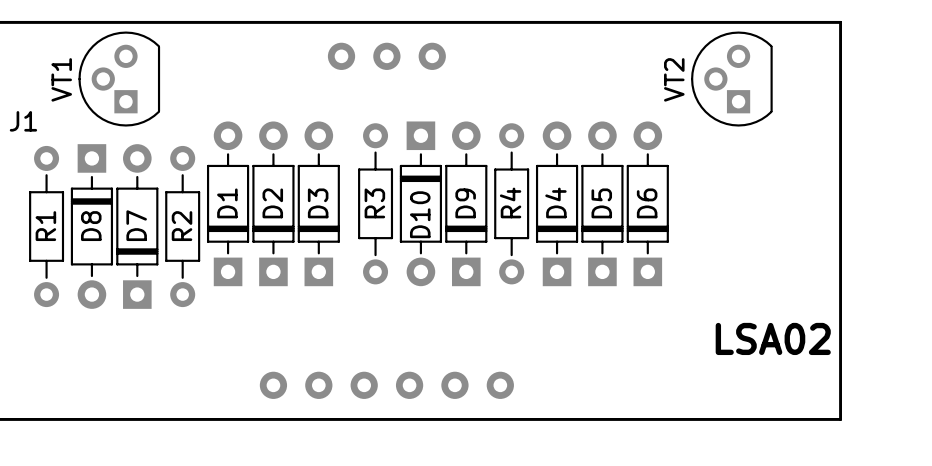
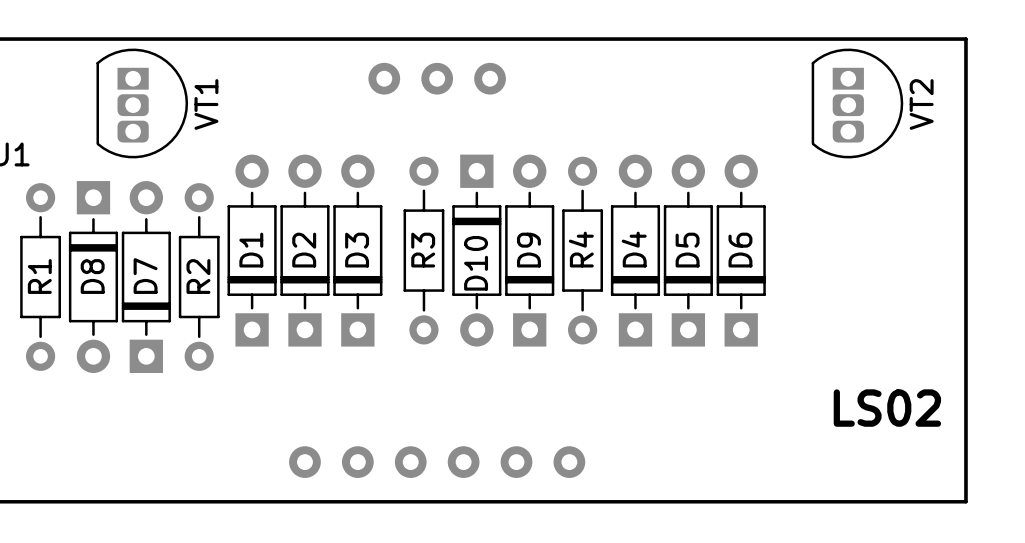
VT1 footprint: [78, 31, 161, 127] -> [96, 48, 189, 159]
VT2 footprint: [691, 31, 773, 127] -> [811, 48, 904, 159]
VT1 name position: VT1 (61, 79) -> VT1 (206, 104)
VT2 name position: VT2 (674, 79) -> VT2 (921, 104)
text: LSA02 (773, 338) -> LS02 (887, 408)

